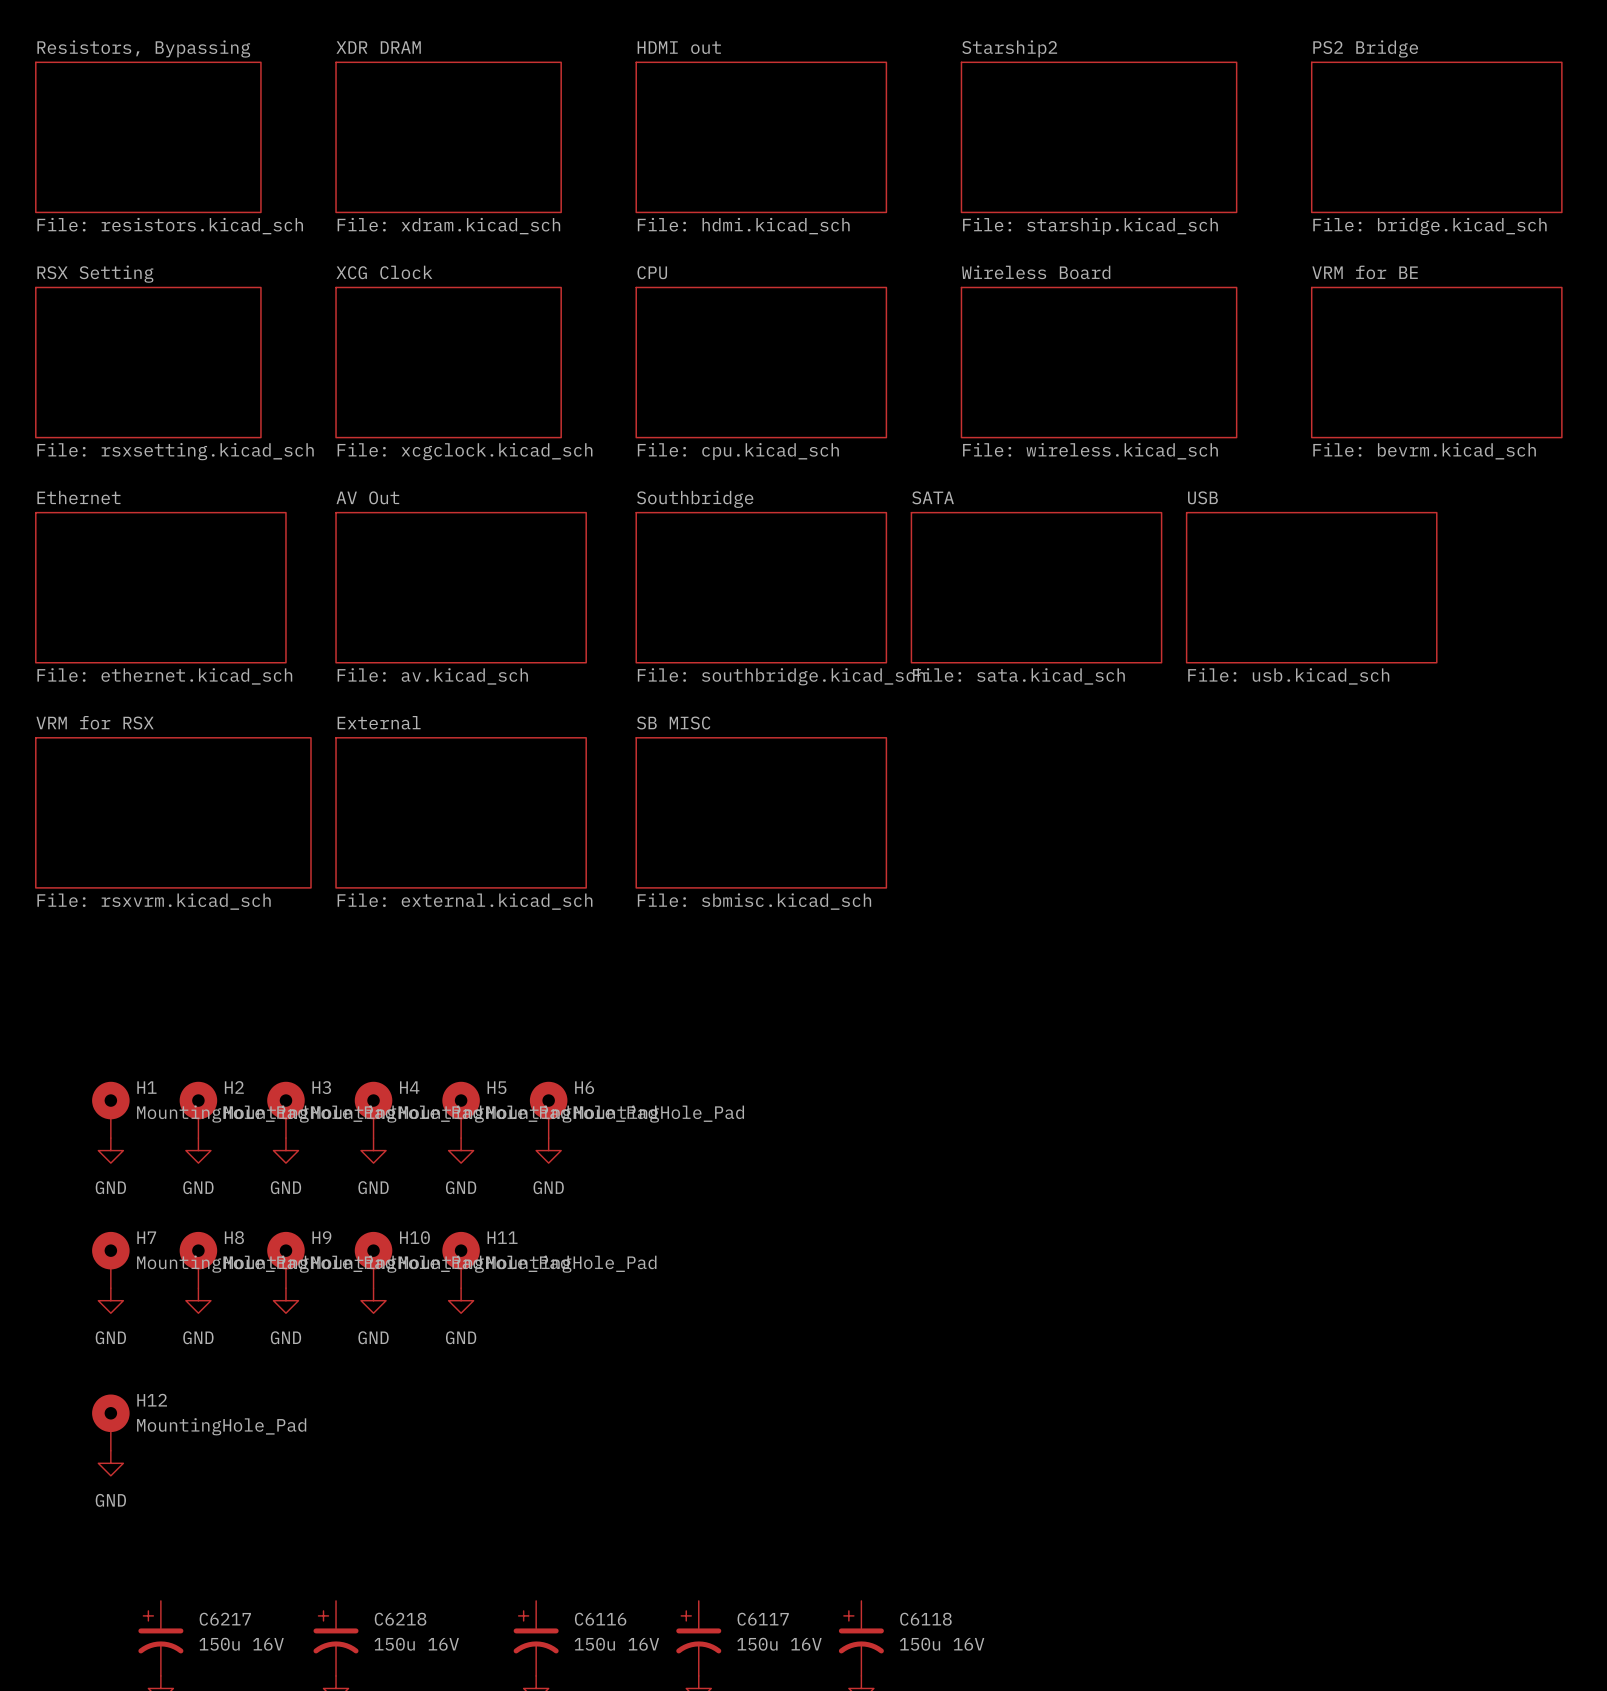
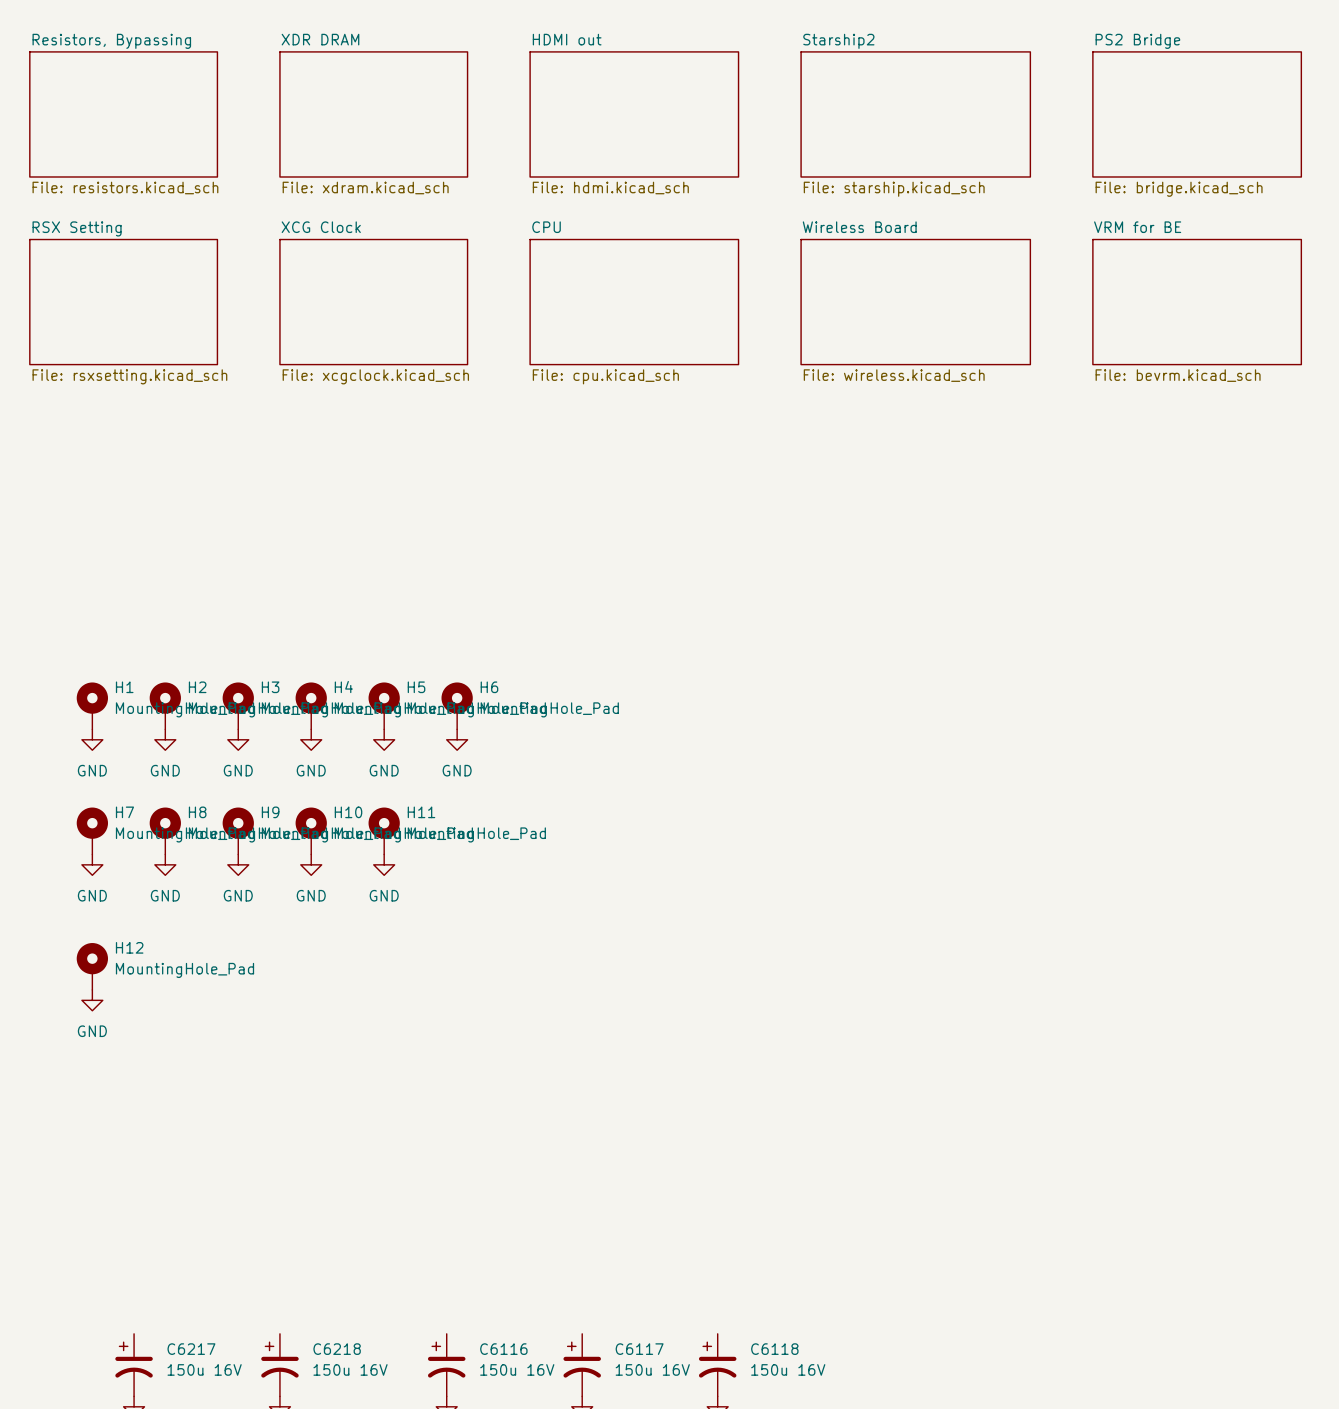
sheet Ethernet: File: ethernet.kicad_sch (160, 587) -> none
sheet AV Out: File: av.kicad_sch (461, 587) -> none
sheet Southbridge: File: southbridge.kicad_sch (761, 587) -> none
sheet SATA: File: sata.kicad_sch (1036, 587) -> none
sheet USB: File: usb.kicad_sch (1311, 587) -> none
sheet VRM for RSX: File: rsxvrm.kicad_sch (173, 812) -> none
sheet External: File: external.kicad_sch (461, 812) -> none
sheet SB MISC: File: sbmisc.kicad_sch (761, 812) -> none
power symbol: none -> GND (92, 739)
power symbol: none -> GND (165, 739)
power symbol: none -> GND (238, 739)
power symbol: none -> GND (311, 739)
power symbol: none -> GND (384, 739)
power symbol: none -> GND (457, 739)
power symbol: none -> GND (92, 864)
power symbol: none -> GND (165, 864)
power symbol: none -> GND (238, 864)
power symbol: none -> GND (311, 864)
power symbol: none -> GND (384, 864)
H1 position: (110, 1109) -> (92, 705)
H2 position: (198, 1109) -> (165, 705)
H3 position: (285, 1109) -> (238, 705)
H4 position: (373, 1109) -> (311, 705)
H5 position: (461, 1109) -> (384, 705)
H6 position: (548, 1109) -> (457, 705)
power symbol: GND (110, 1150) -> none
power symbol: GND (198, 1150) -> none
power symbol: GND (285, 1150) -> none
power symbol: GND (373, 1150) -> none
power symbol: GND (461, 1150) -> none
power symbol: GND (548, 1150) -> none
power symbol: none -> GND (92, 1000)
H7 position: (110, 1260) -> (92, 830)
H8 position: (198, 1260) -> (165, 830)
H9 position: (285, 1260) -> (238, 830)
H10 position: (373, 1260) -> (311, 830)
H11 position: (461, 1260) -> (384, 830)
power symbol: GND (110, 1300) -> none
power symbol: GND (198, 1300) -> none
power symbol: GND (285, 1300) -> none
power symbol: GND (373, 1300) -> none
power symbol: GND (461, 1300) -> none
H12 position: (110, 1422) -> (92, 966)
power symbol: GND (110, 1463) -> none

